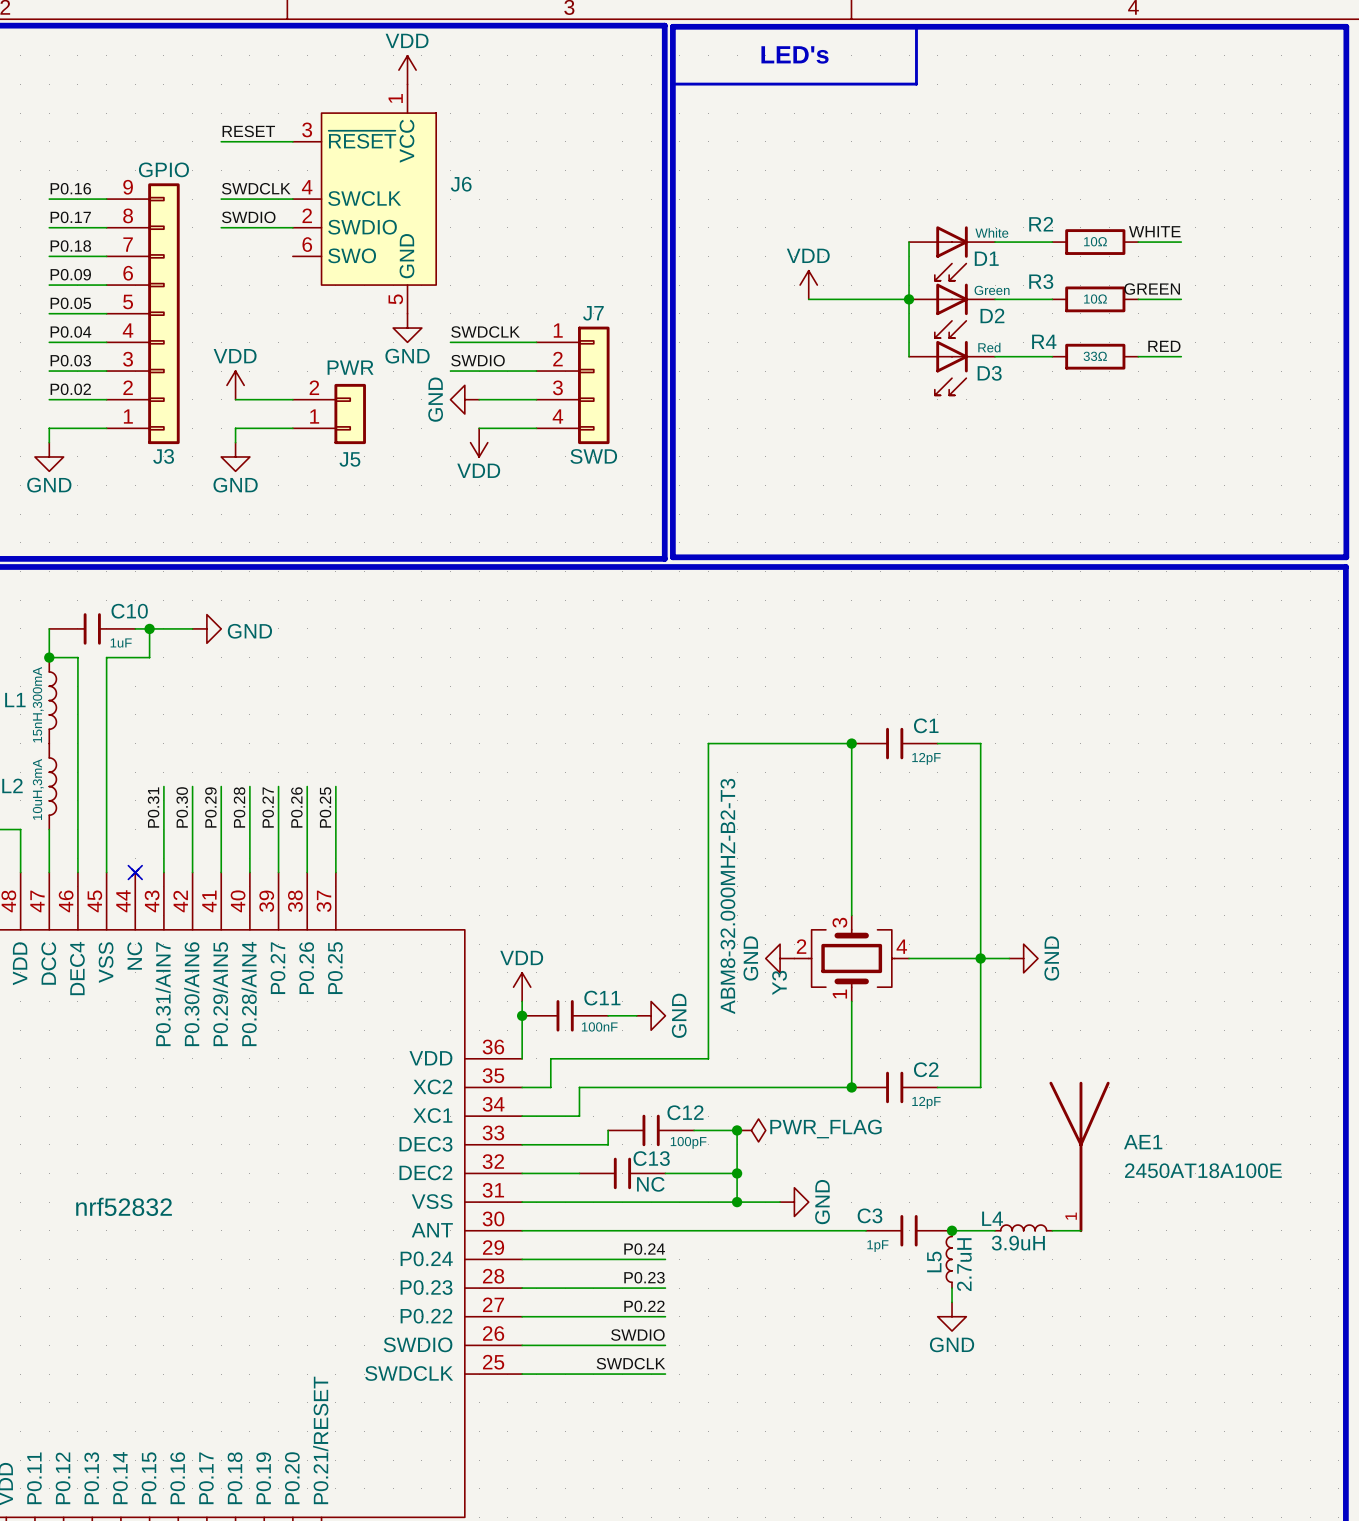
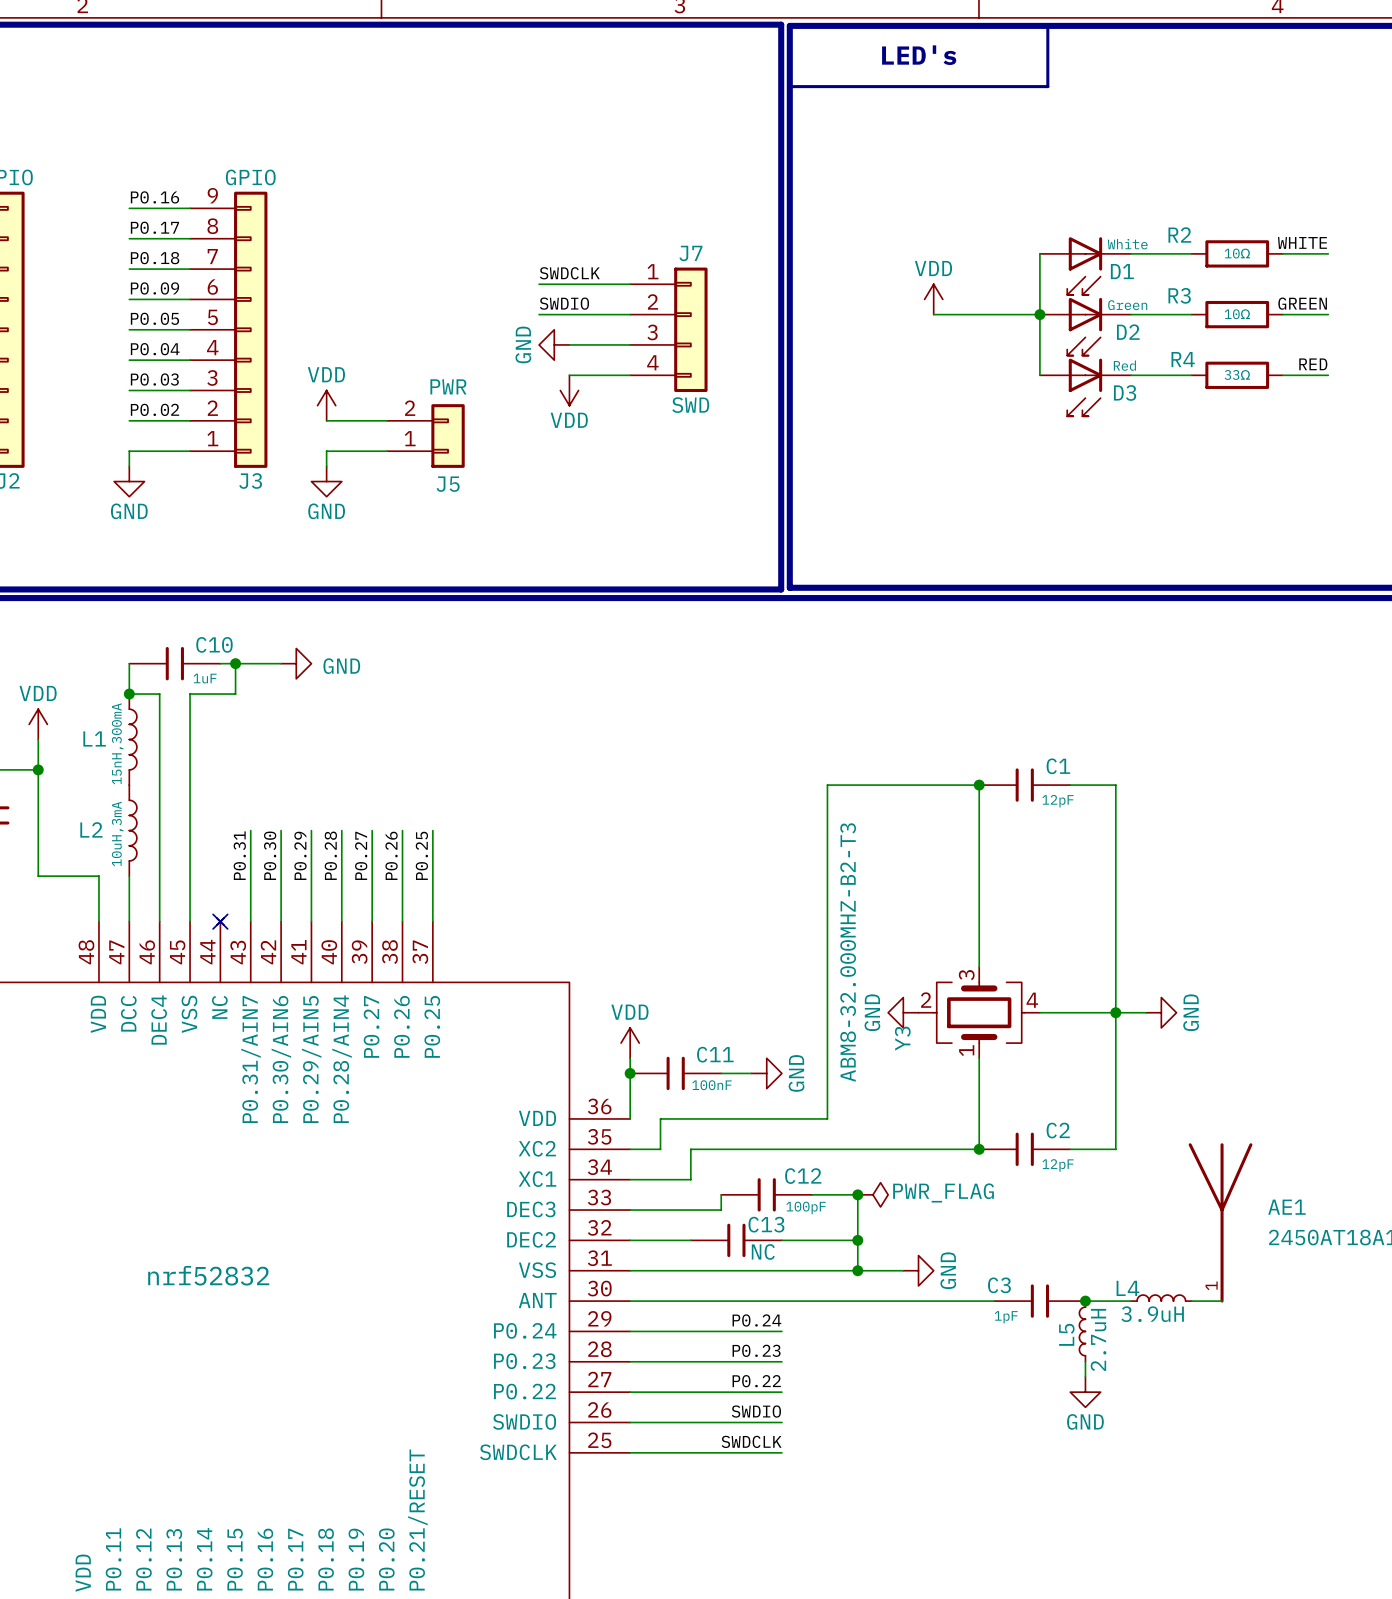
power symbol: VDD (407, 70) -> none
label: RESET (248, 131) -> none
wire: (221, 141) (292, 141) -> none
label: SWDCLK (256, 188) -> none
wire: (221, 199) (292, 199) -> none
J6: (364, 199) -> none
label: SWDIO (248, 217) -> none
wire: (221, 227) (292, 227) -> none
power symbol: GND (407, 328) -> none
power symbol: none -> GND (554, 344)
label position: SWDCLK (485, 332) -> SWDCLK (569, 273)
wire: (450, 342) (536, 342) -> (539, 284) (630, 284)
label position: SWDIO (478, 360) -> SWDIO (564, 303)
wire: (450, 371) (536, 371) -> (539, 314) (630, 314)
J7 position: (573, 385) -> (668, 329)
power symbol: GND (464, 399) -> none
wire: (479, 399) (536, 399) -> (569, 344) (630, 344)
wire: (479, 428) (536, 428) -> (569, 375) (630, 375)
power symbol position: VDD (479, 442) -> VDD (569, 390)

